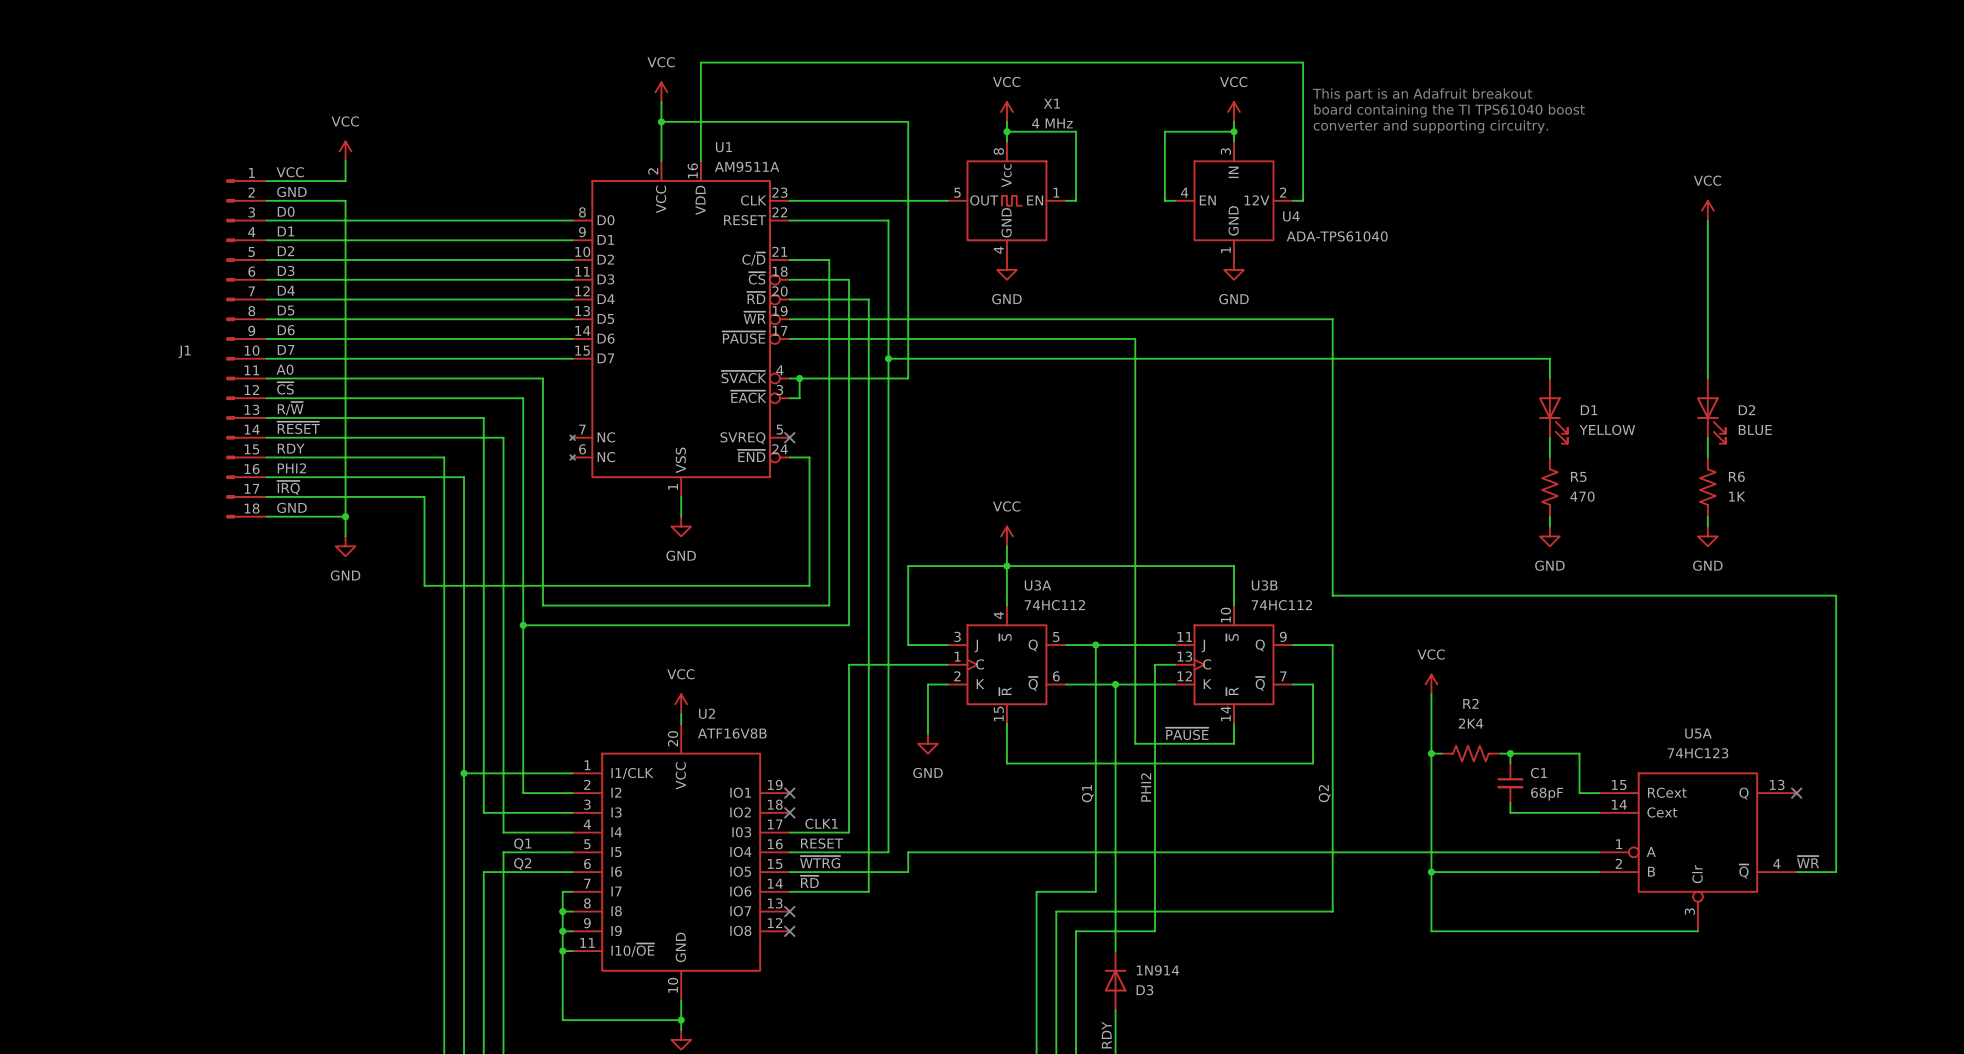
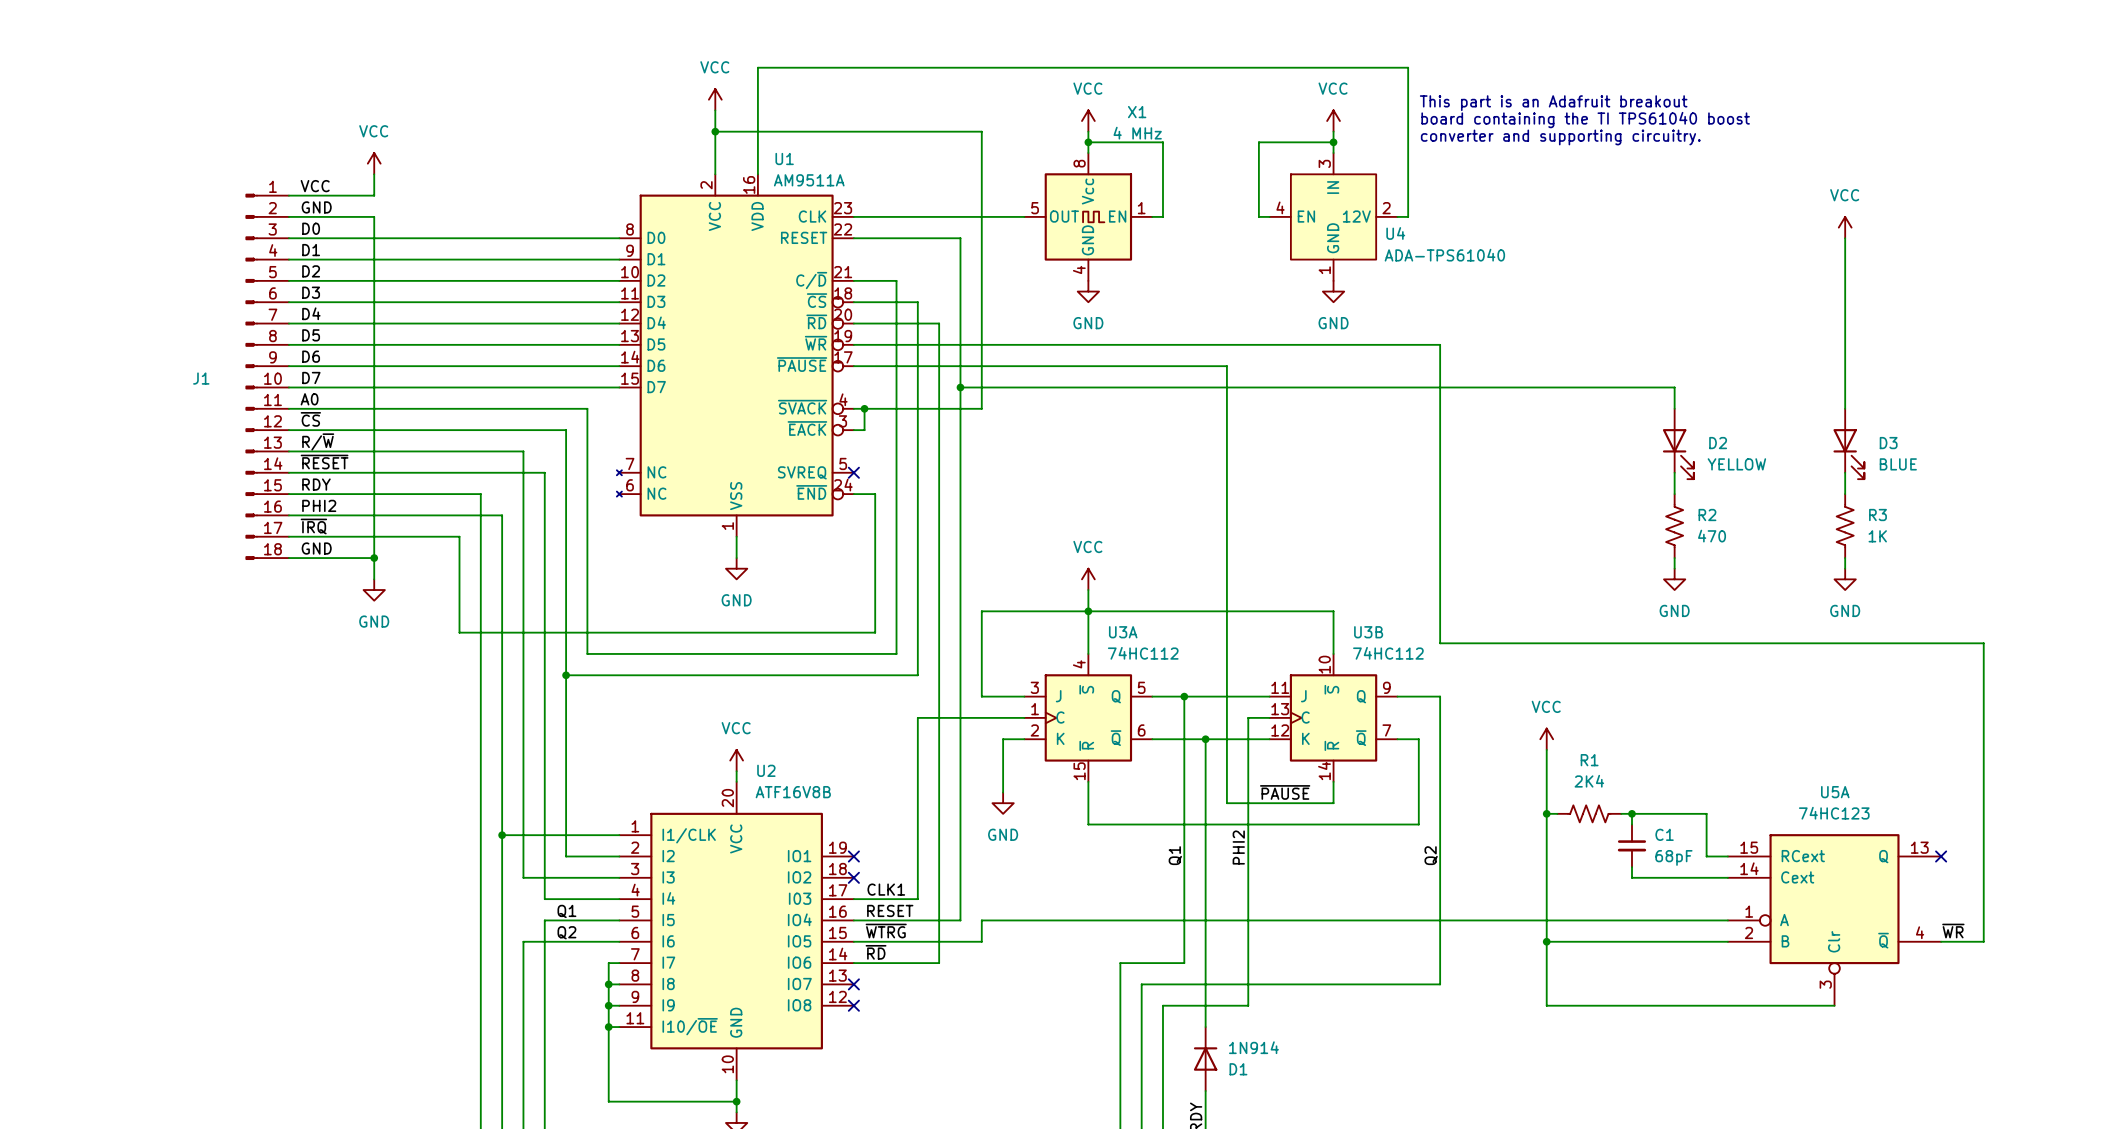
D1 name: D1 (1589, 410) -> D2 (1718, 443)
D2 name: D2 (1746, 410) -> D3 (1888, 443)
R5 name: R5 (1578, 476) -> R2 (1707, 515)
R6 name: R6 (1736, 476) -> R3 (1877, 515)
R2 name: R2 (1470, 703) -> R1 (1589, 760)
D3 name: D3 (1144, 990) -> D1 (1238, 1069)

